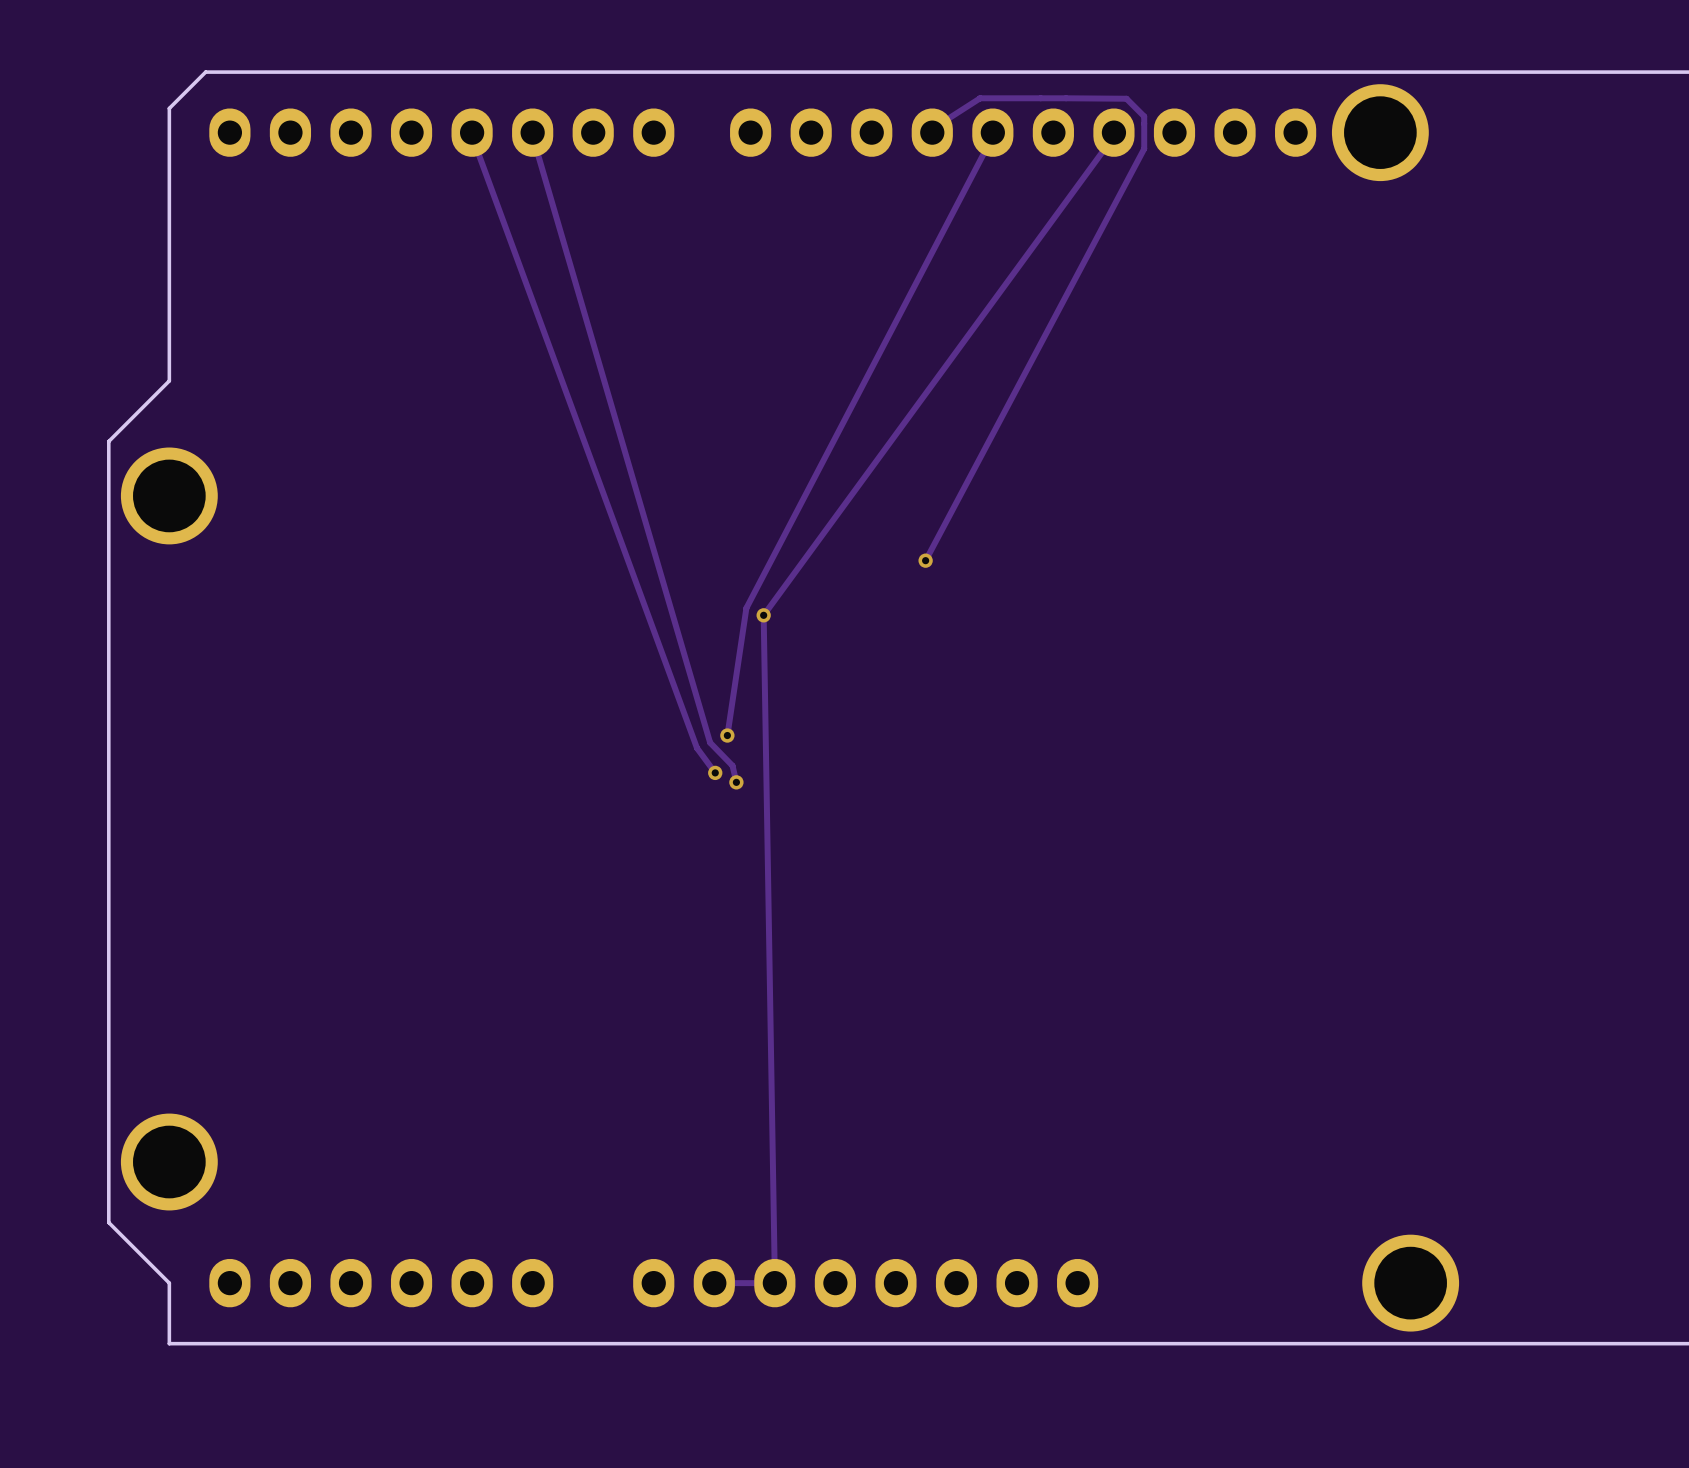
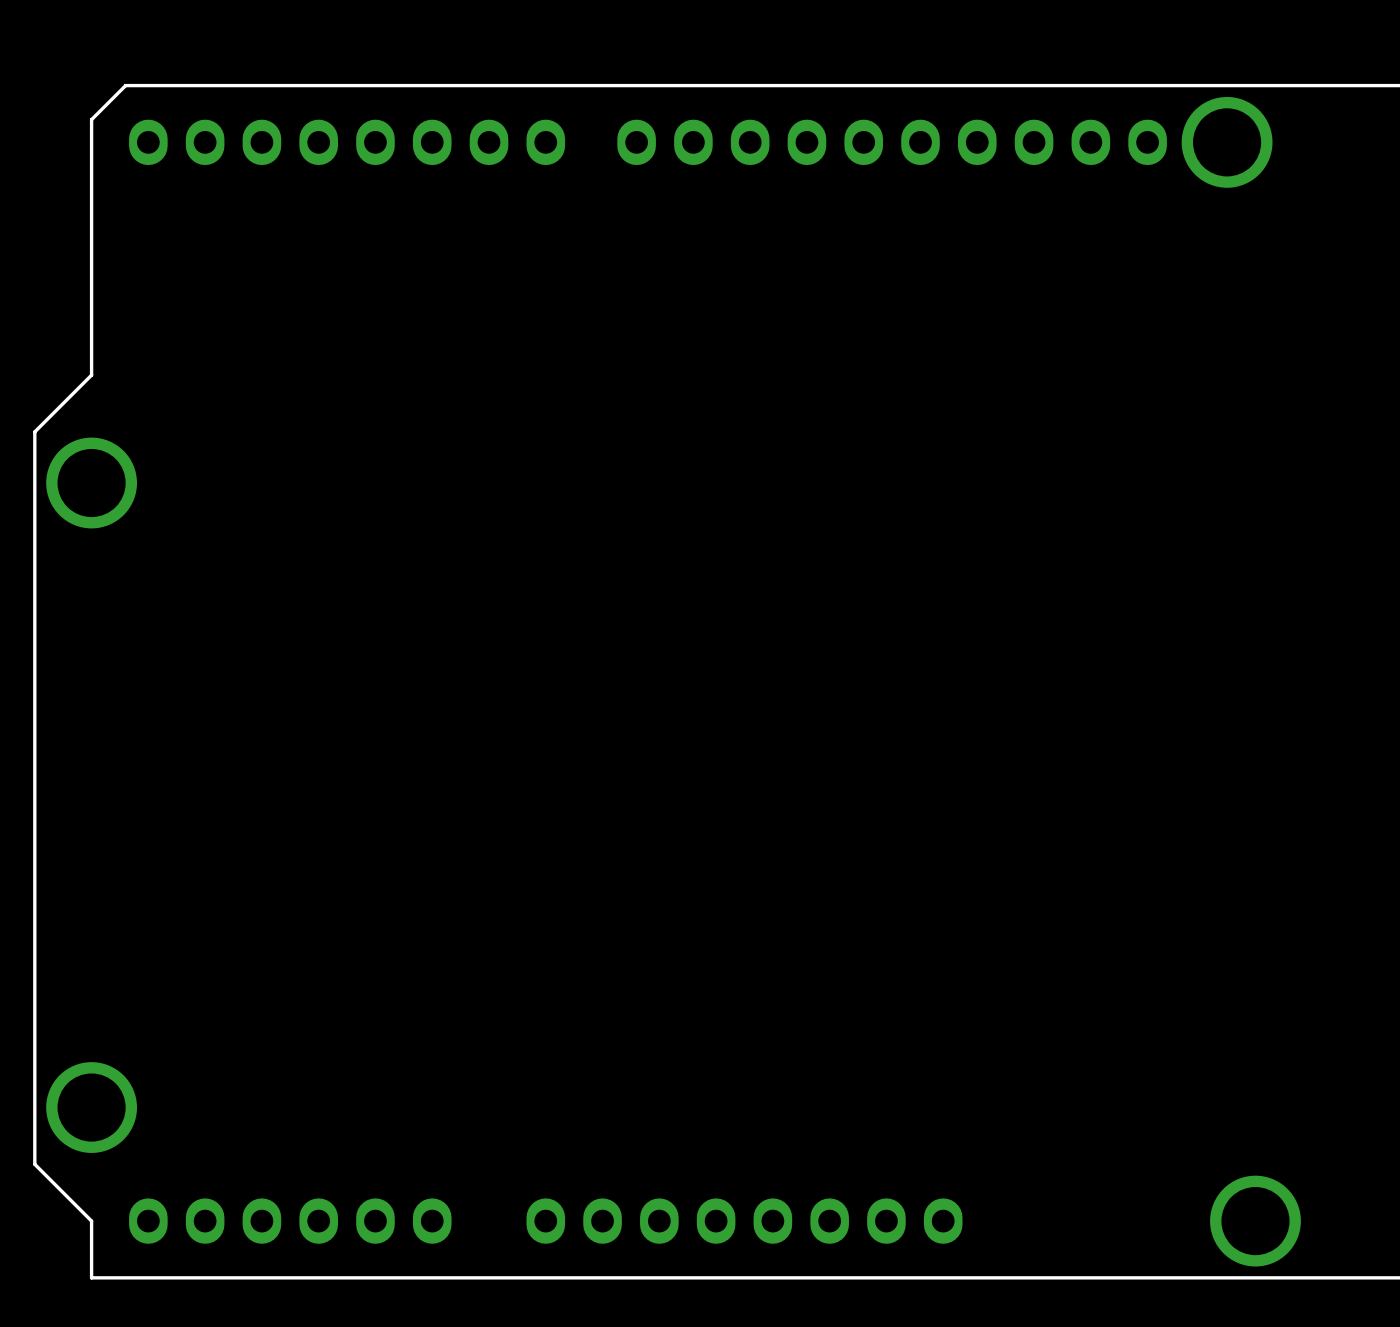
track: (980, 98) (1126, 98) (1144, 116) (1144, 148) (925, 560) -> none
track: (980, 98) (932, 129) (932, 132) -> none
track: (472, 132) (696, 748) (715, 772) -> none
track: (532, 132) (710, 742) (732, 765) (736, 782) -> none
track: (992, 132) (992, 136) (746, 608) (727, 735) -> none
track: (1113, 132) (1113, 136) (763, 615) (774, 1283) (714, 1283) -> none
via: (925, 560) -> none
via: (763, 615) -> none
via: (727, 735) -> none
via: (715, 772) -> none
via: (736, 782) -> none

